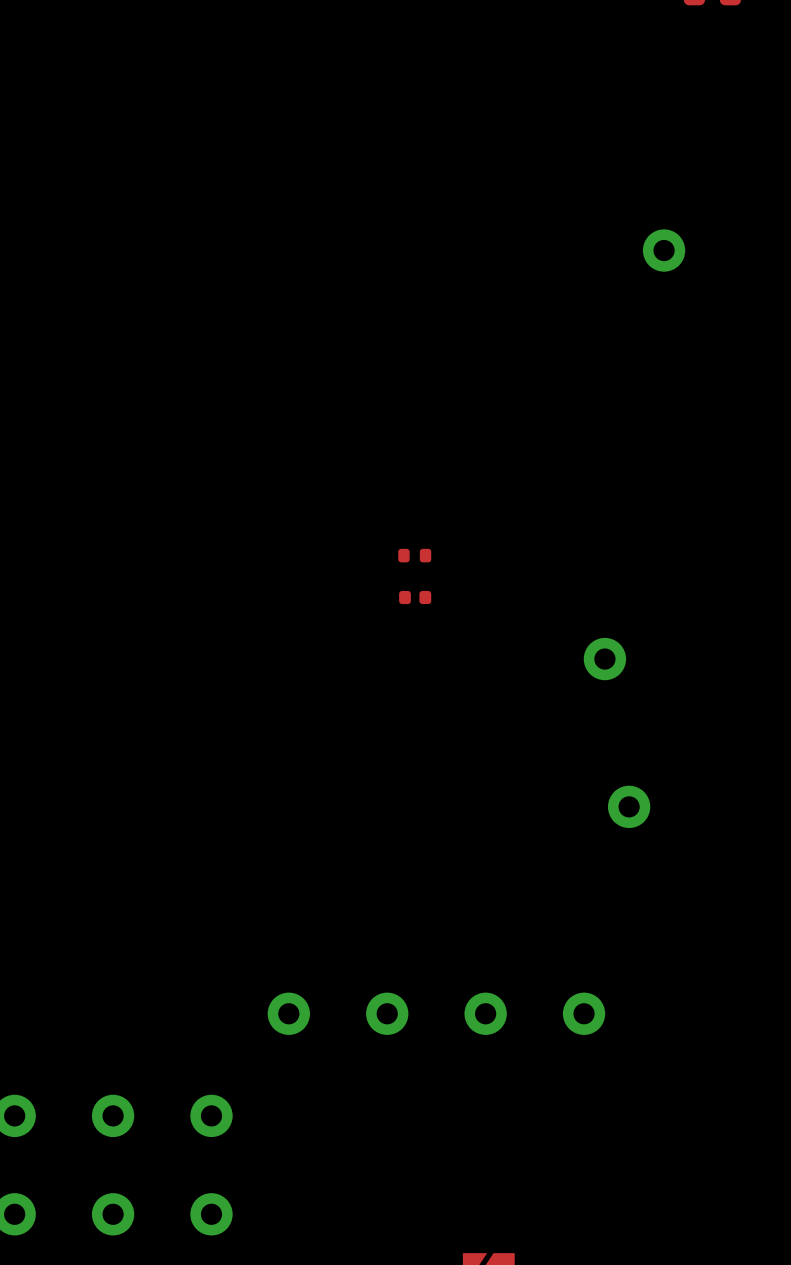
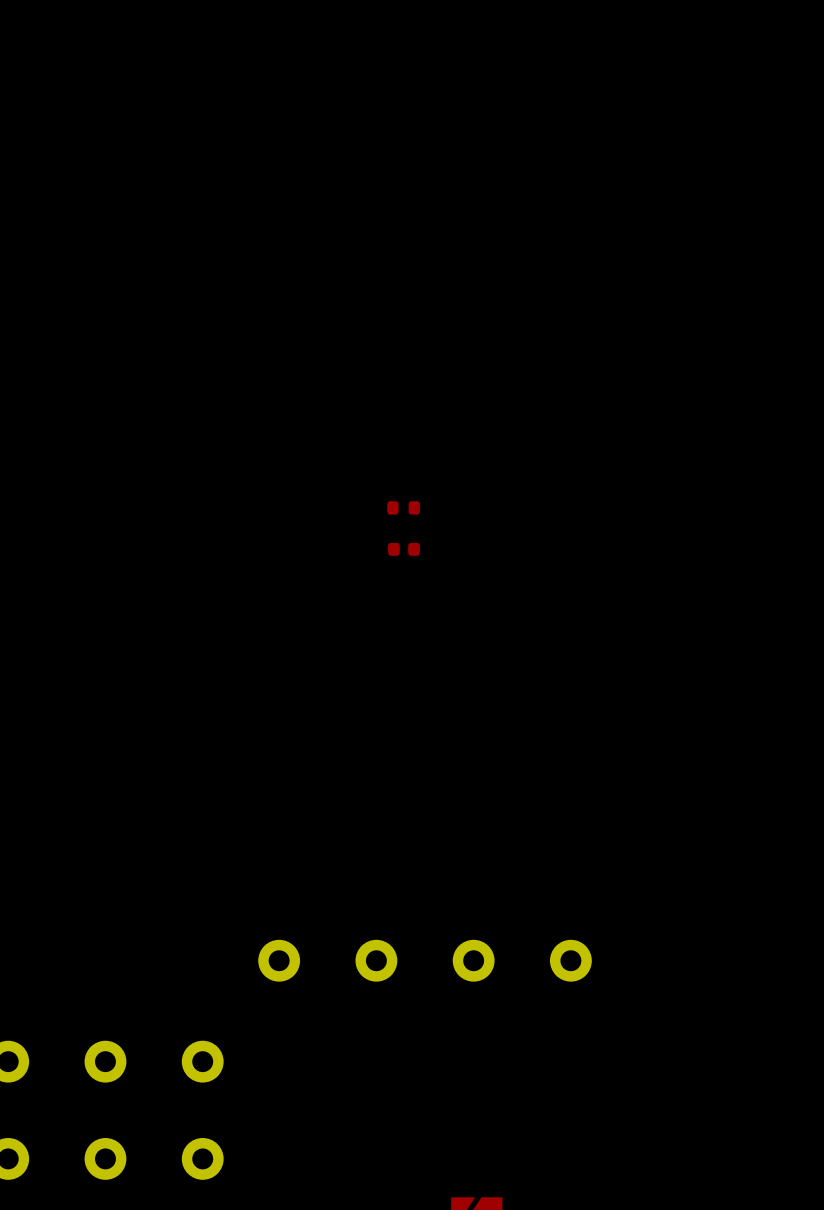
part: (664, 250) -> none
part: (604, 659) -> none
part: (629, 806) -> none

